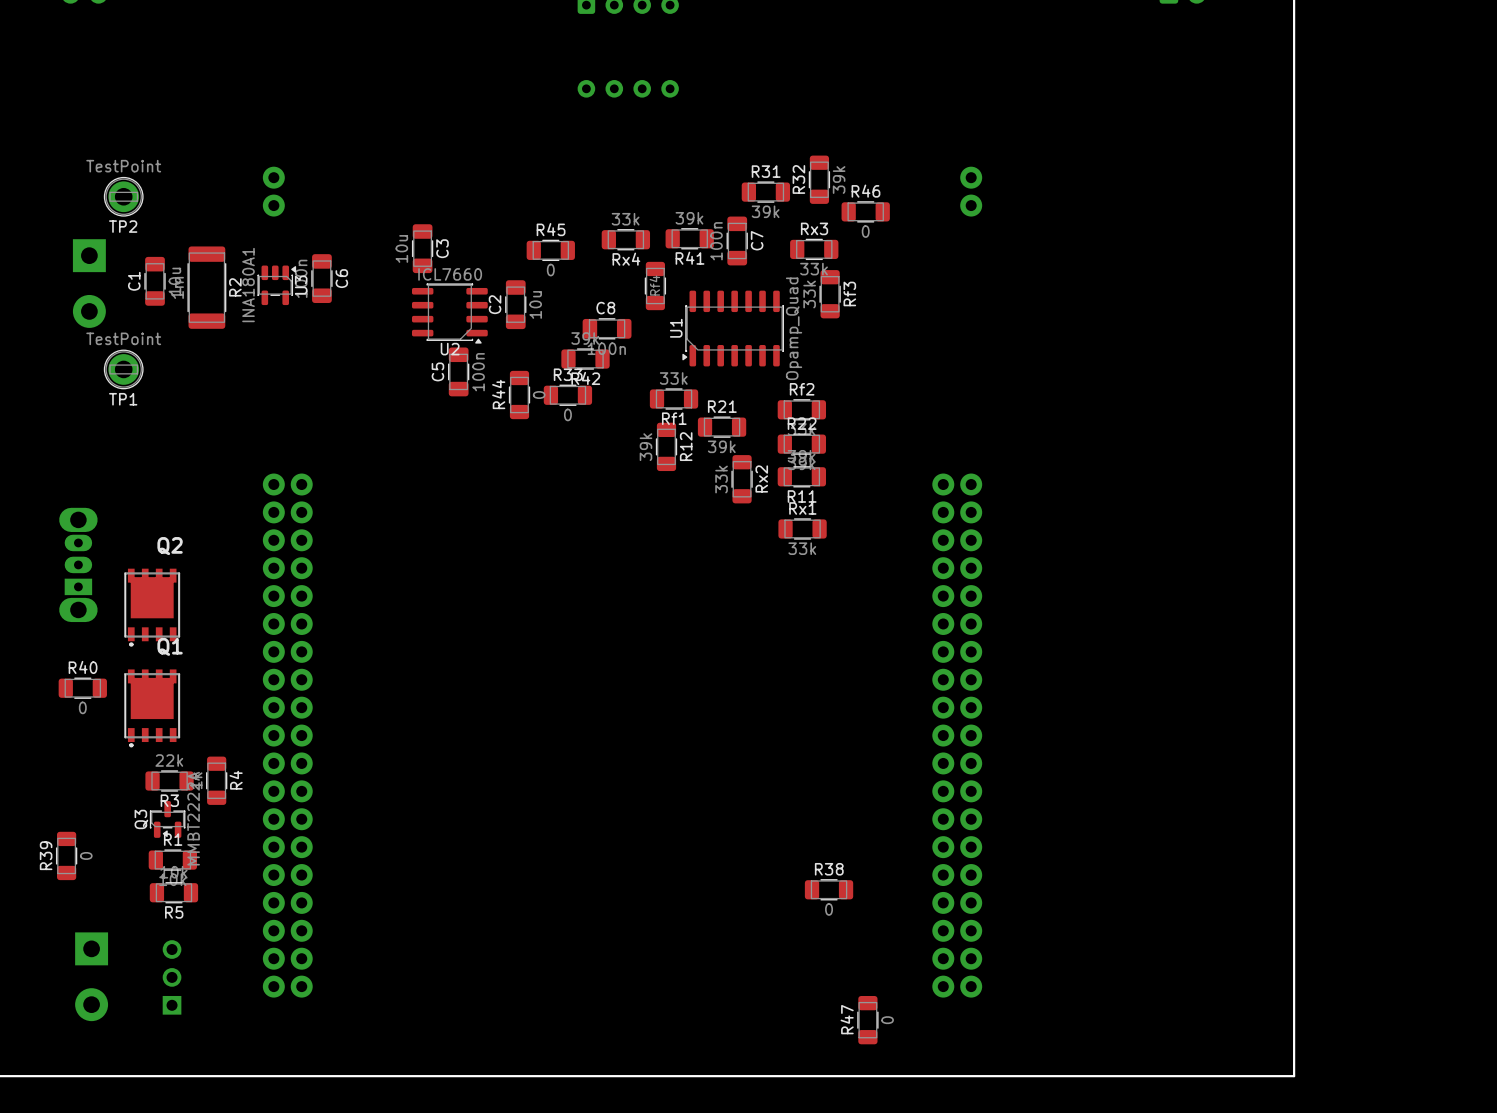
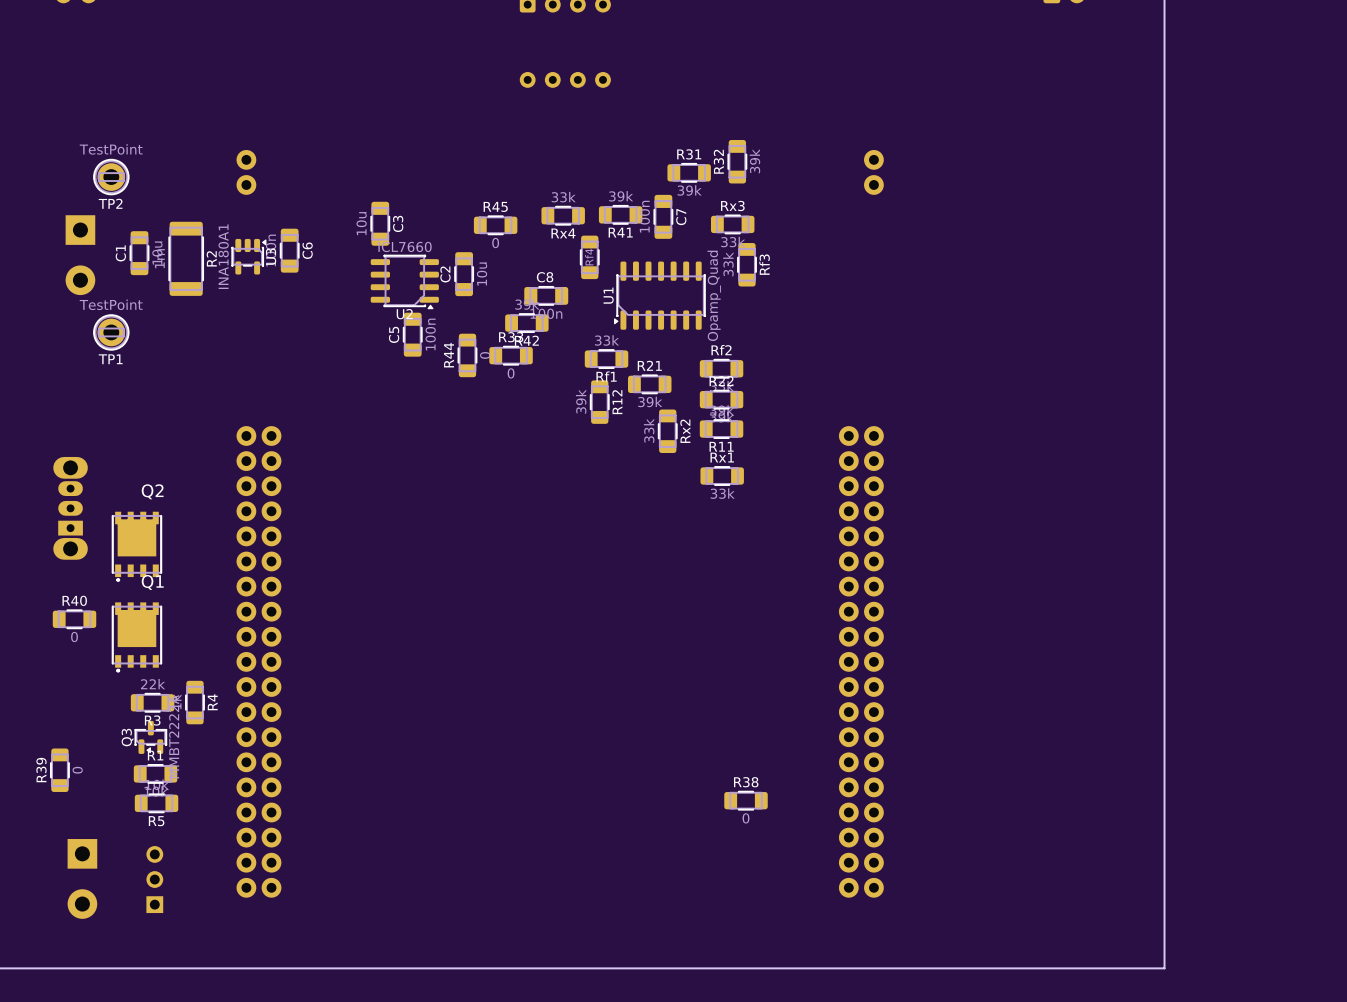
R46: 0 (865, 211) -> none
R47: 0 (867, 1020) -> none

